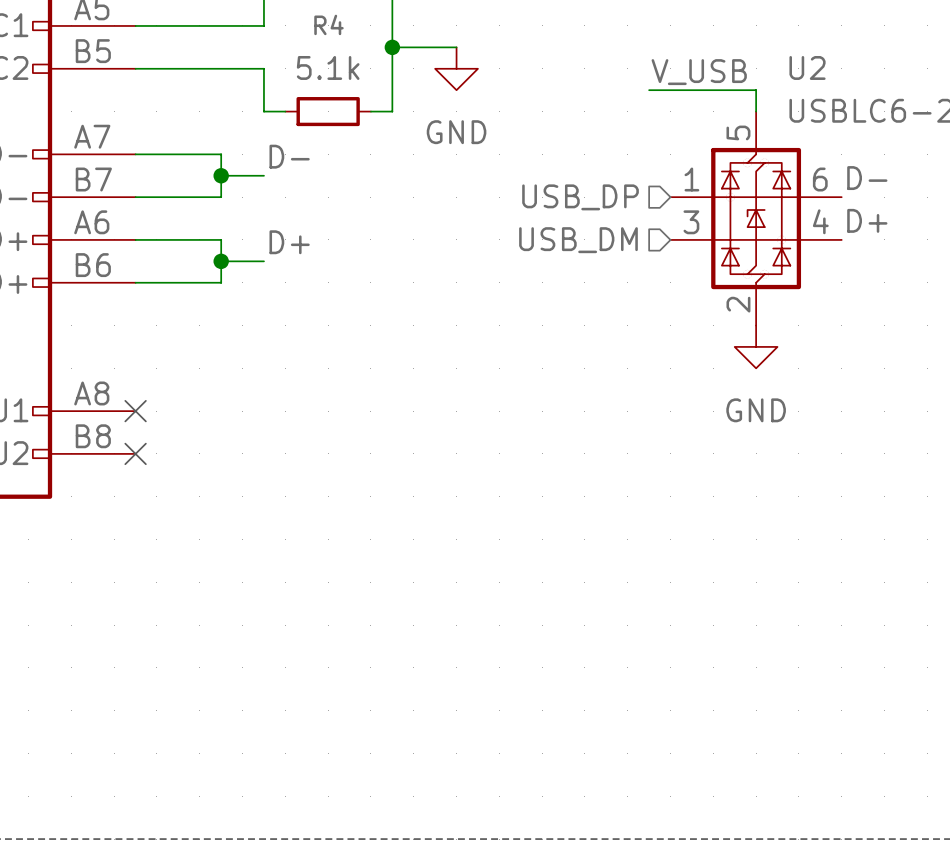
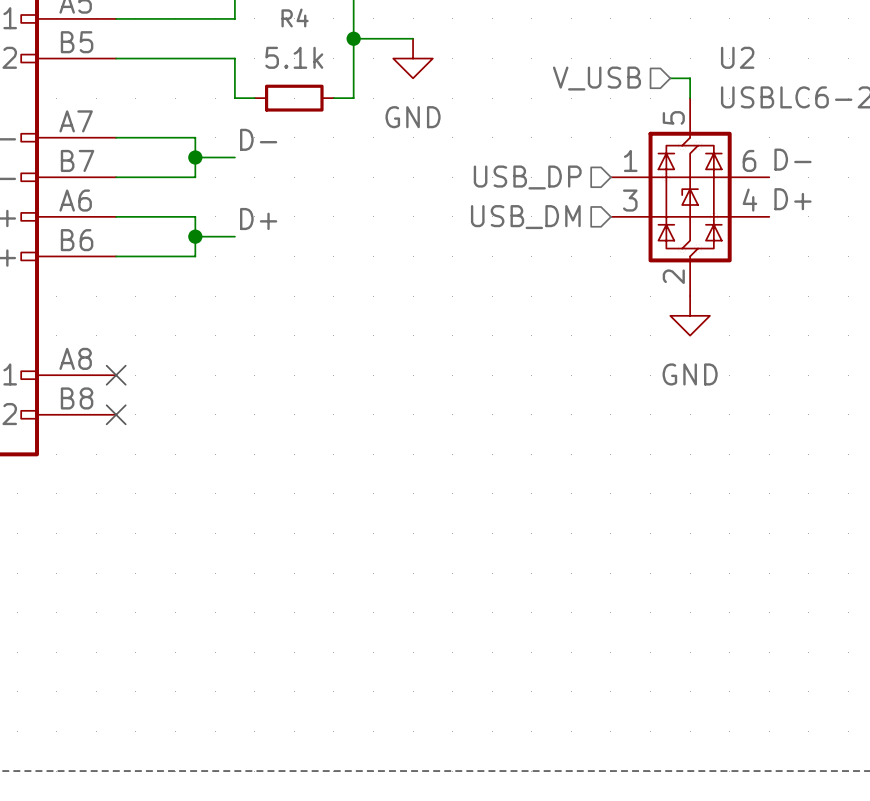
label: V_USB (699, 72) -> none
wire: (649, 90) (734, 90) -> none
hierarchical label: none -> V_USB (596, 78)

